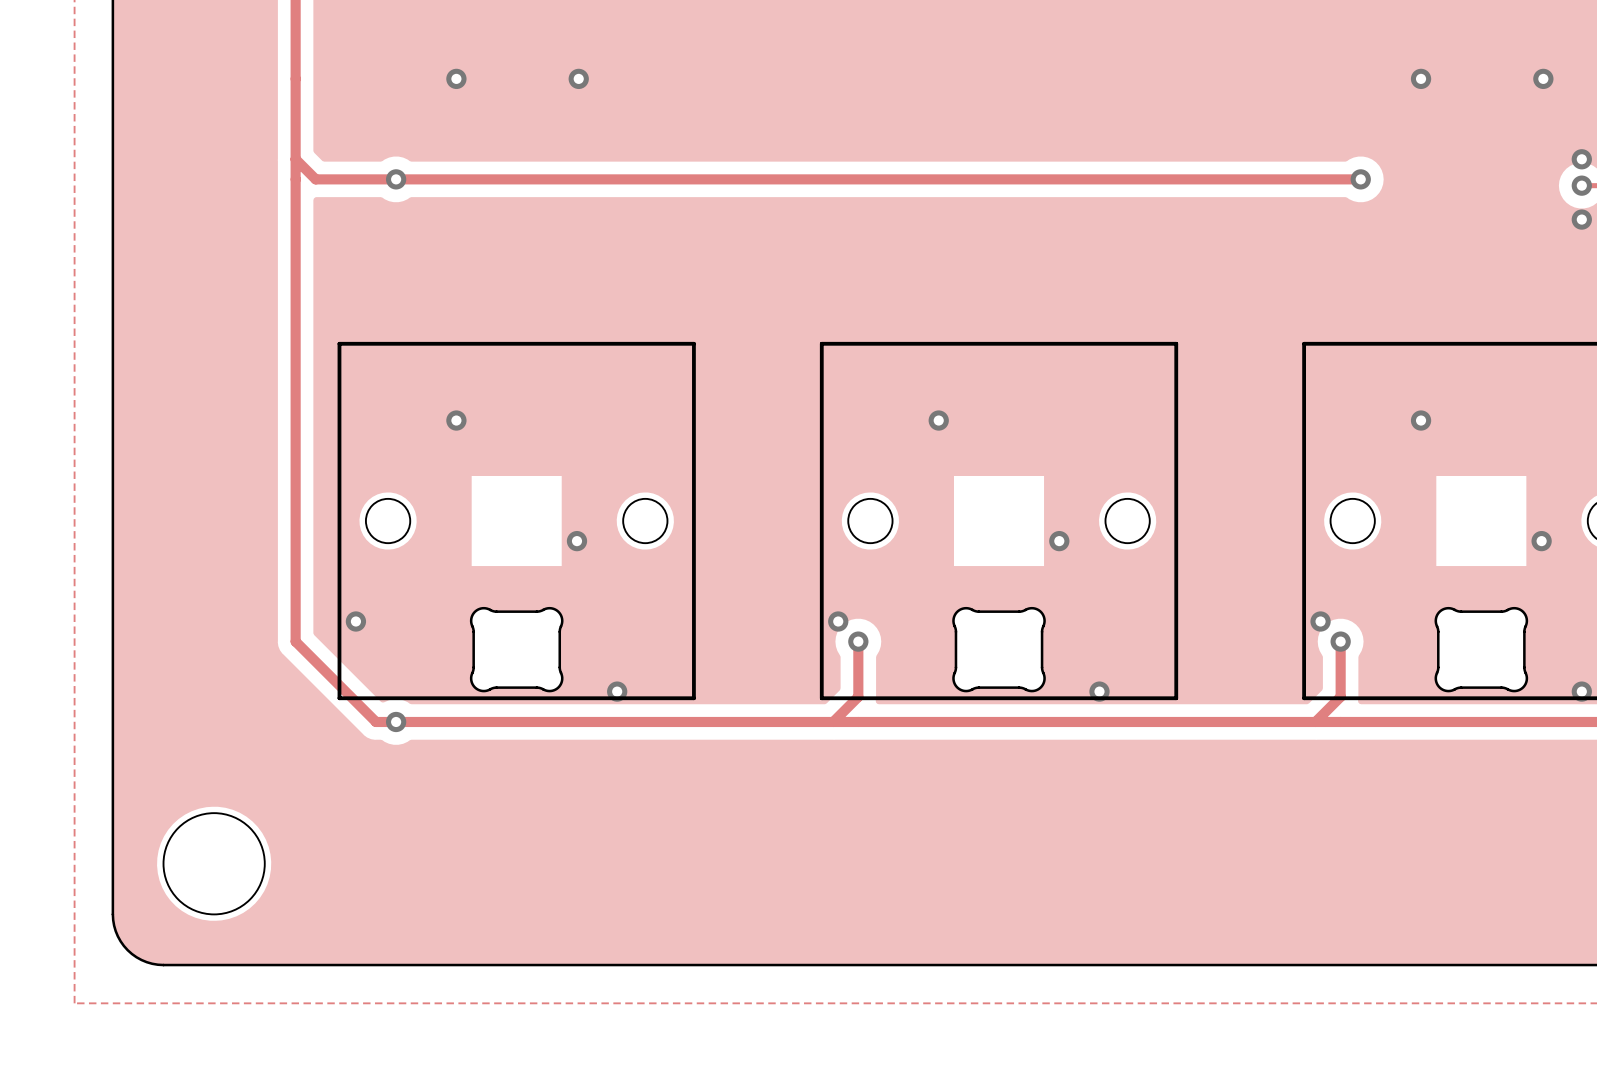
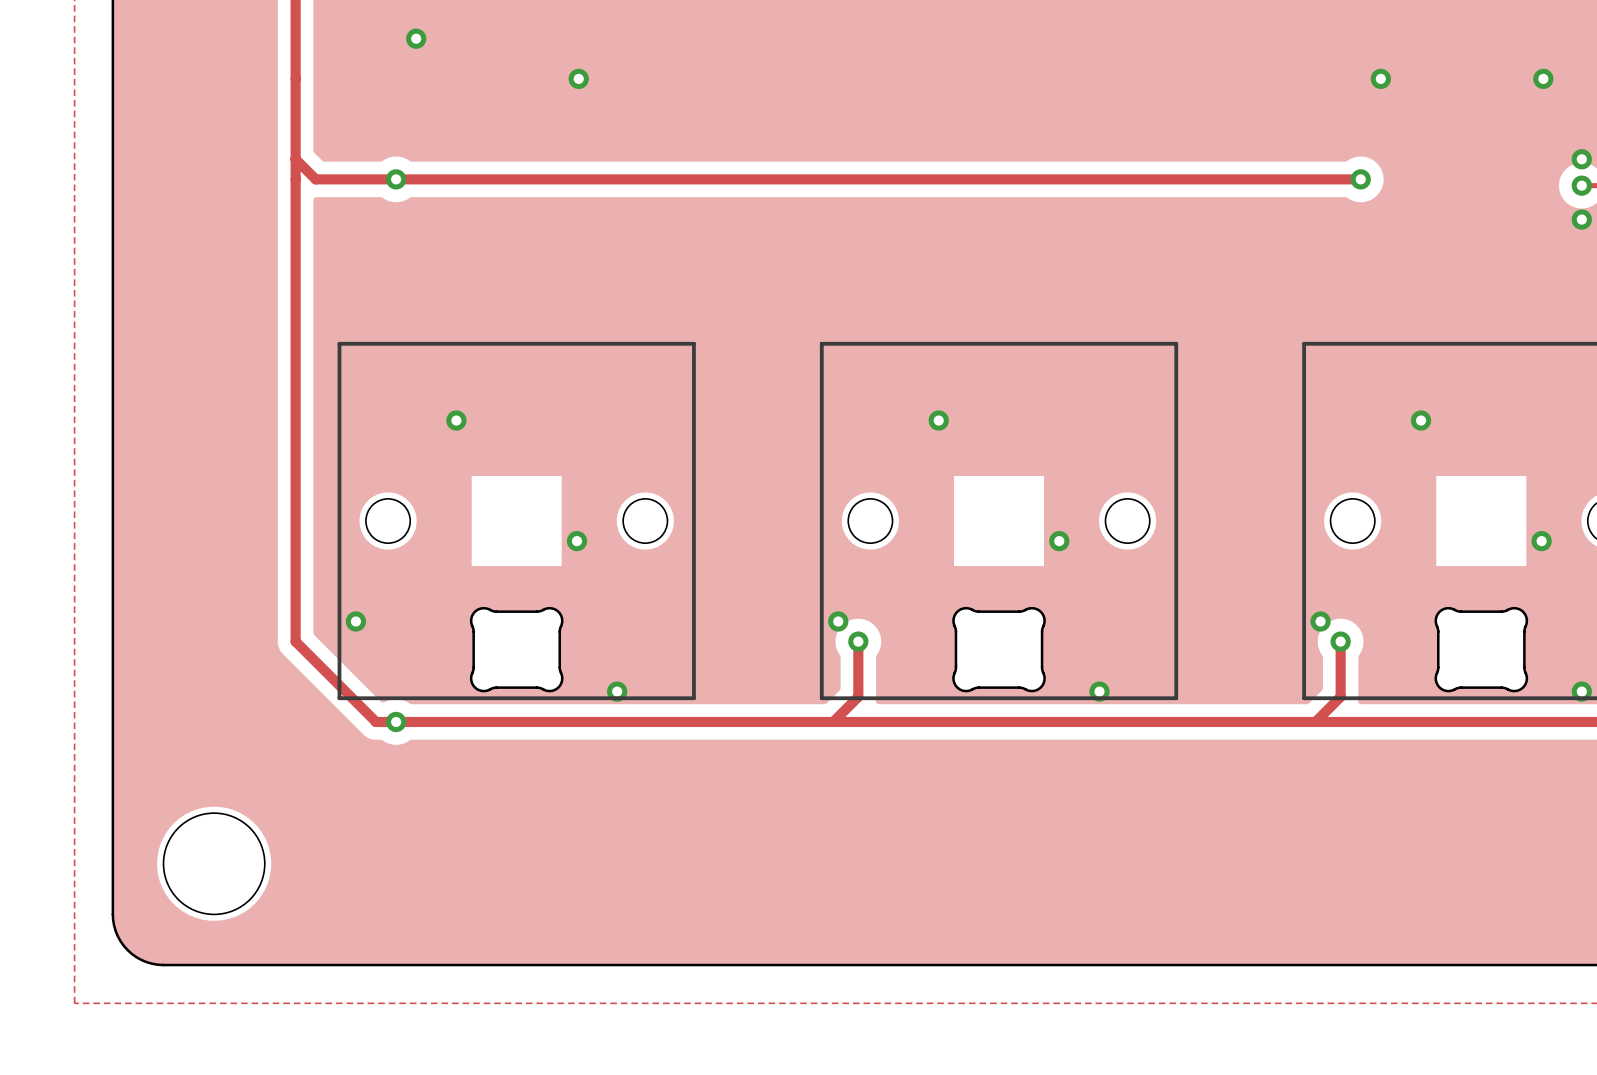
via position: (456, 78) -> (416, 38)
via position: (1421, 78) -> (1380, 78)

